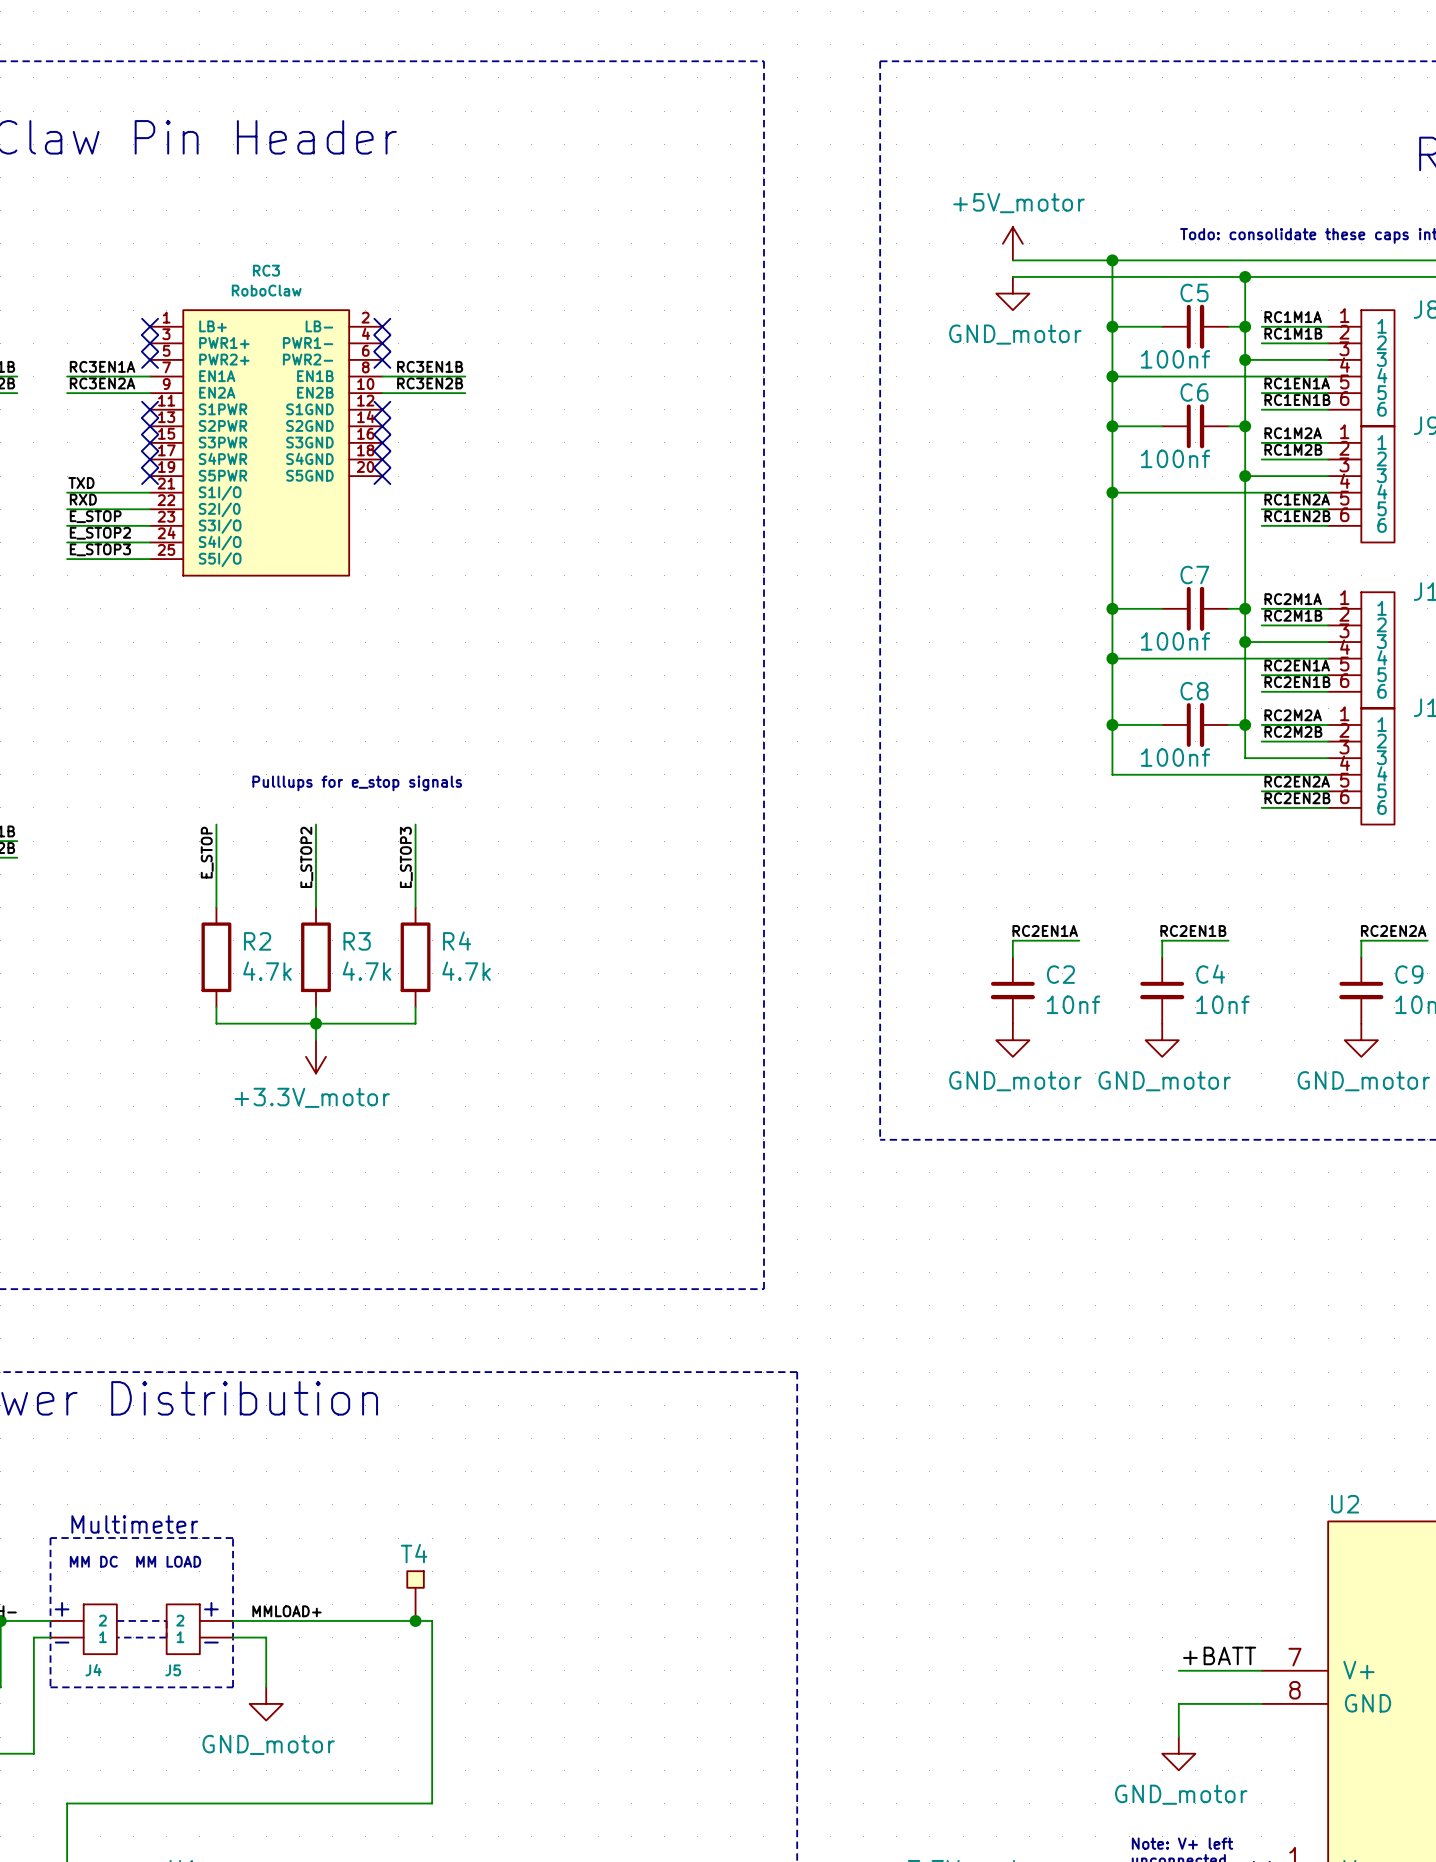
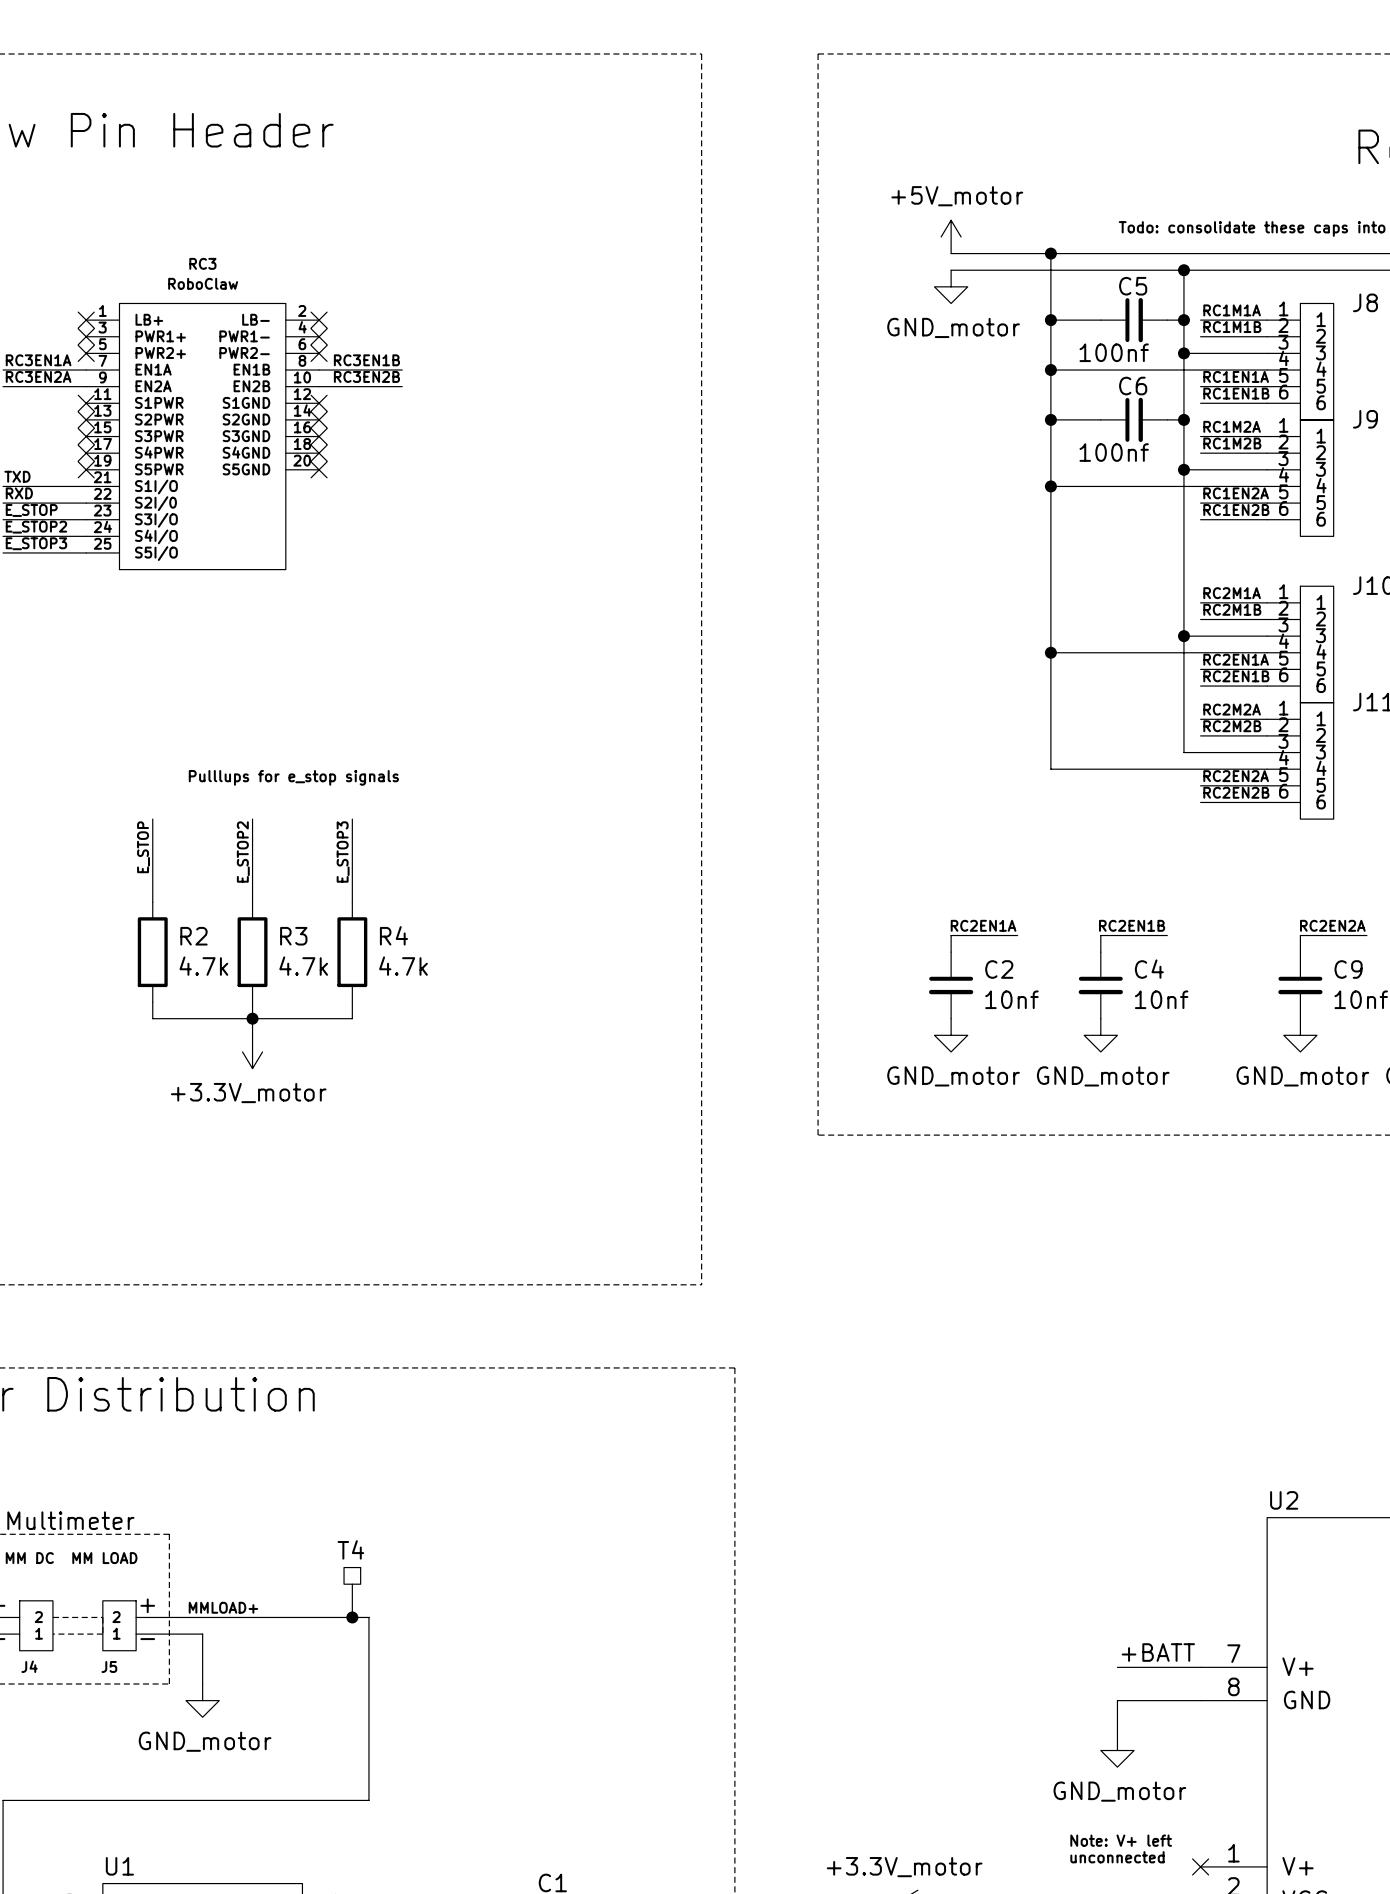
wire: (1112, 608) (1162, 608) -> none
junction: (1112, 608) -> none
C7: 100nf (1195, 608) -> none
wire: (1228, 608) (1245, 608) -> none
junction: (1245, 608) -> none
wire: (1112, 724) (1162, 724) -> none
junction: (1112, 724) -> none
C8: 100nf (1195, 724) -> none
wire: (1228, 724) (1245, 724) -> none
junction: (1245, 724) -> none

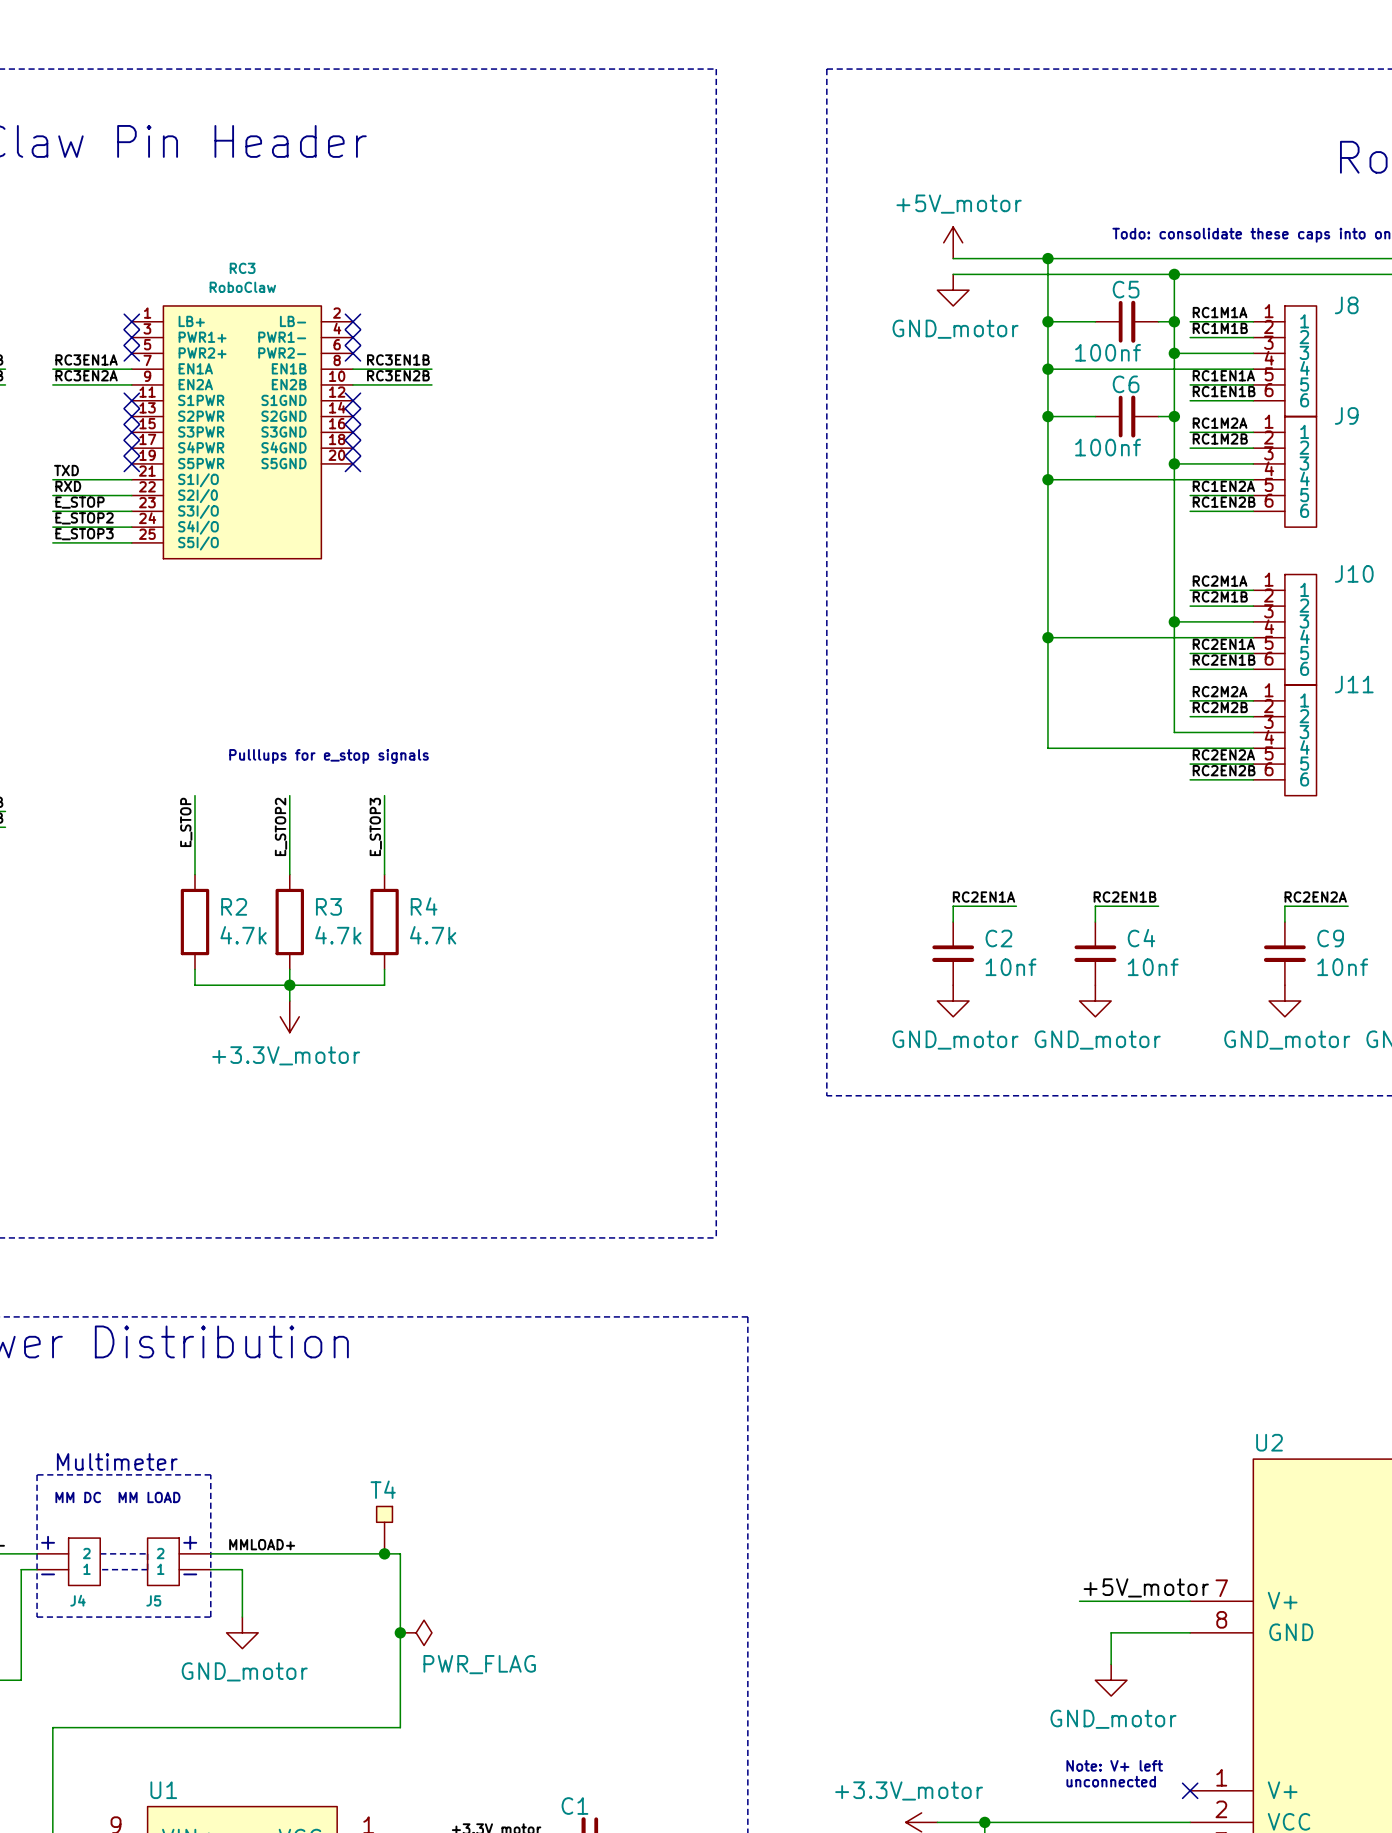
label: +BATT (1158, 1652) -> none
label: none -> +5V_motor (1146, 1587)
wire: none -> (1079, 1601) (1111, 1601)
junction: none -> (400, 1632)
power symbol: none -> PWR_FLAG (416, 1632)

